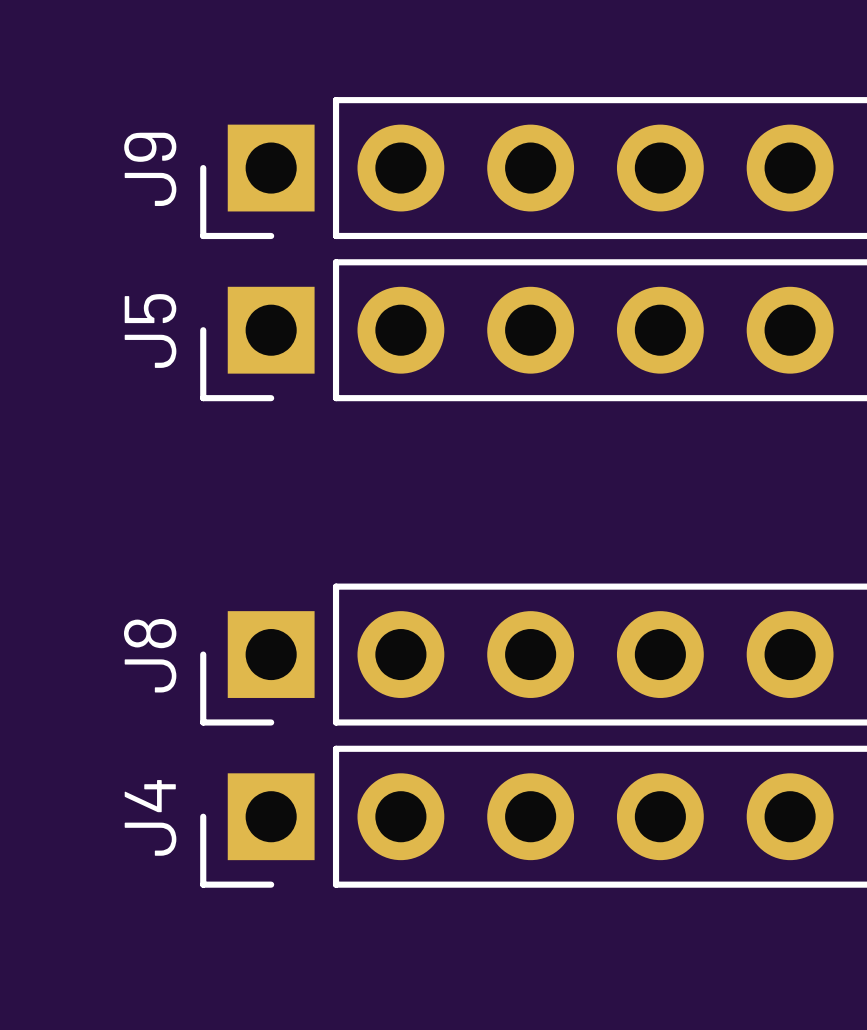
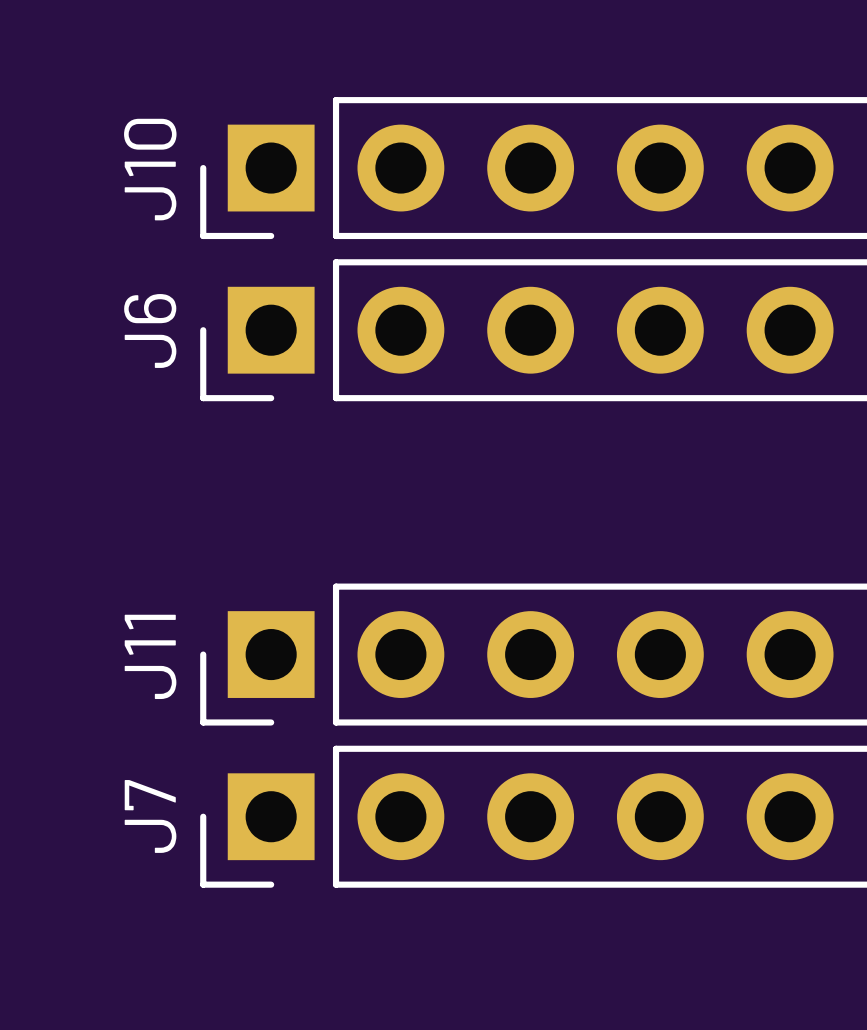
J9 name: J9 (150, 169) -> J10 (150, 169)
J5 name: J5 (150, 330) -> J6 (150, 330)
J8 name: J8 (150, 655) -> J11 (150, 656)
J4 name: J4 (150, 817) -> J7 (150, 816)

